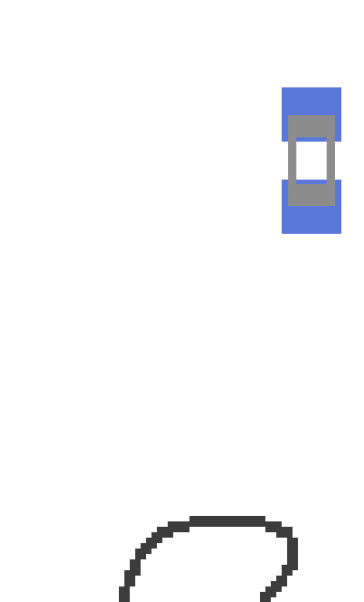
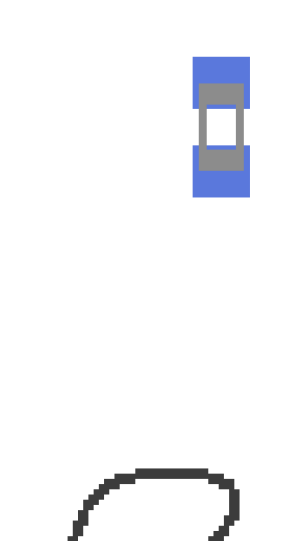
part position: (311, 160) -> (221, 127)

